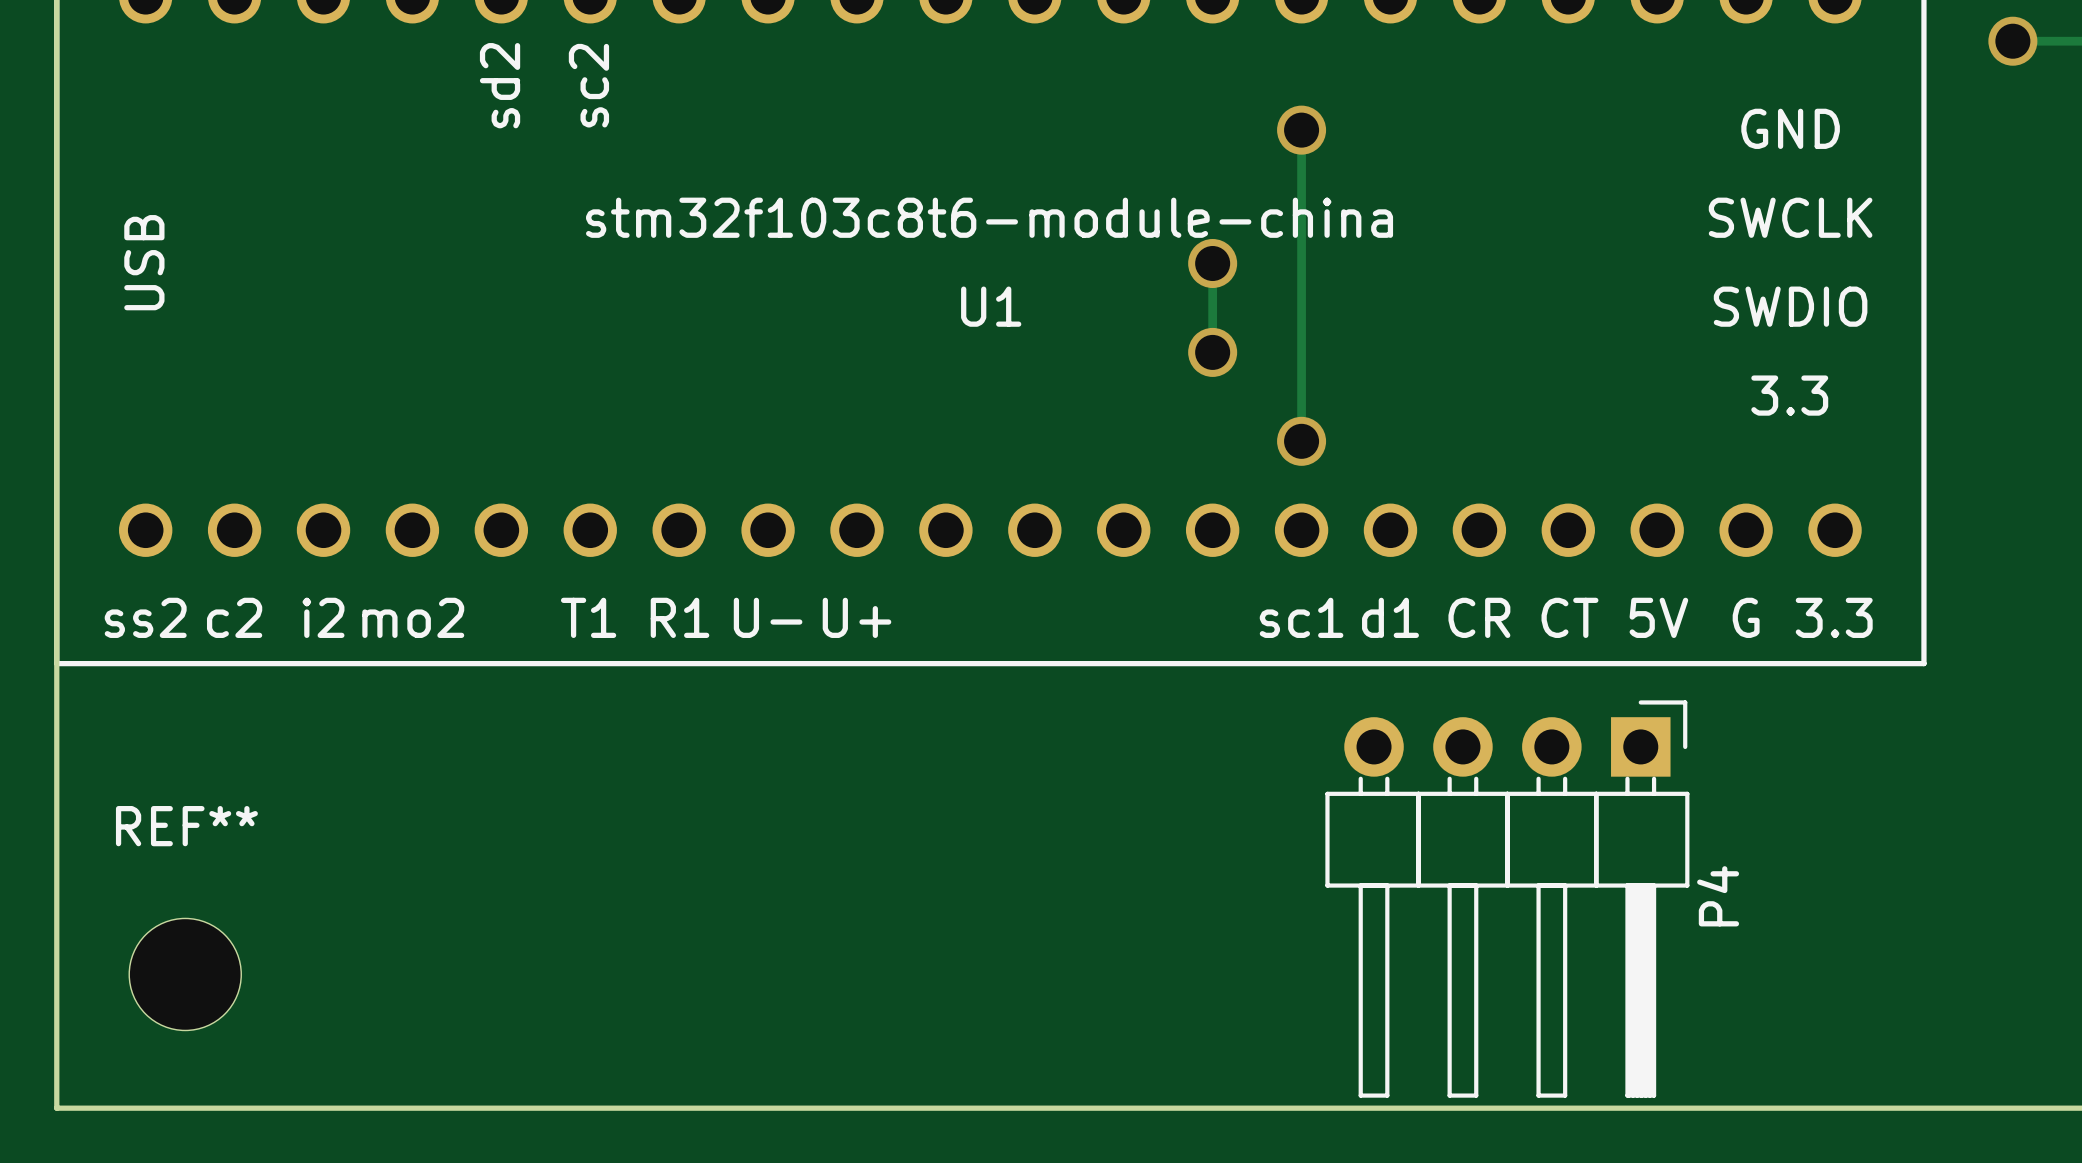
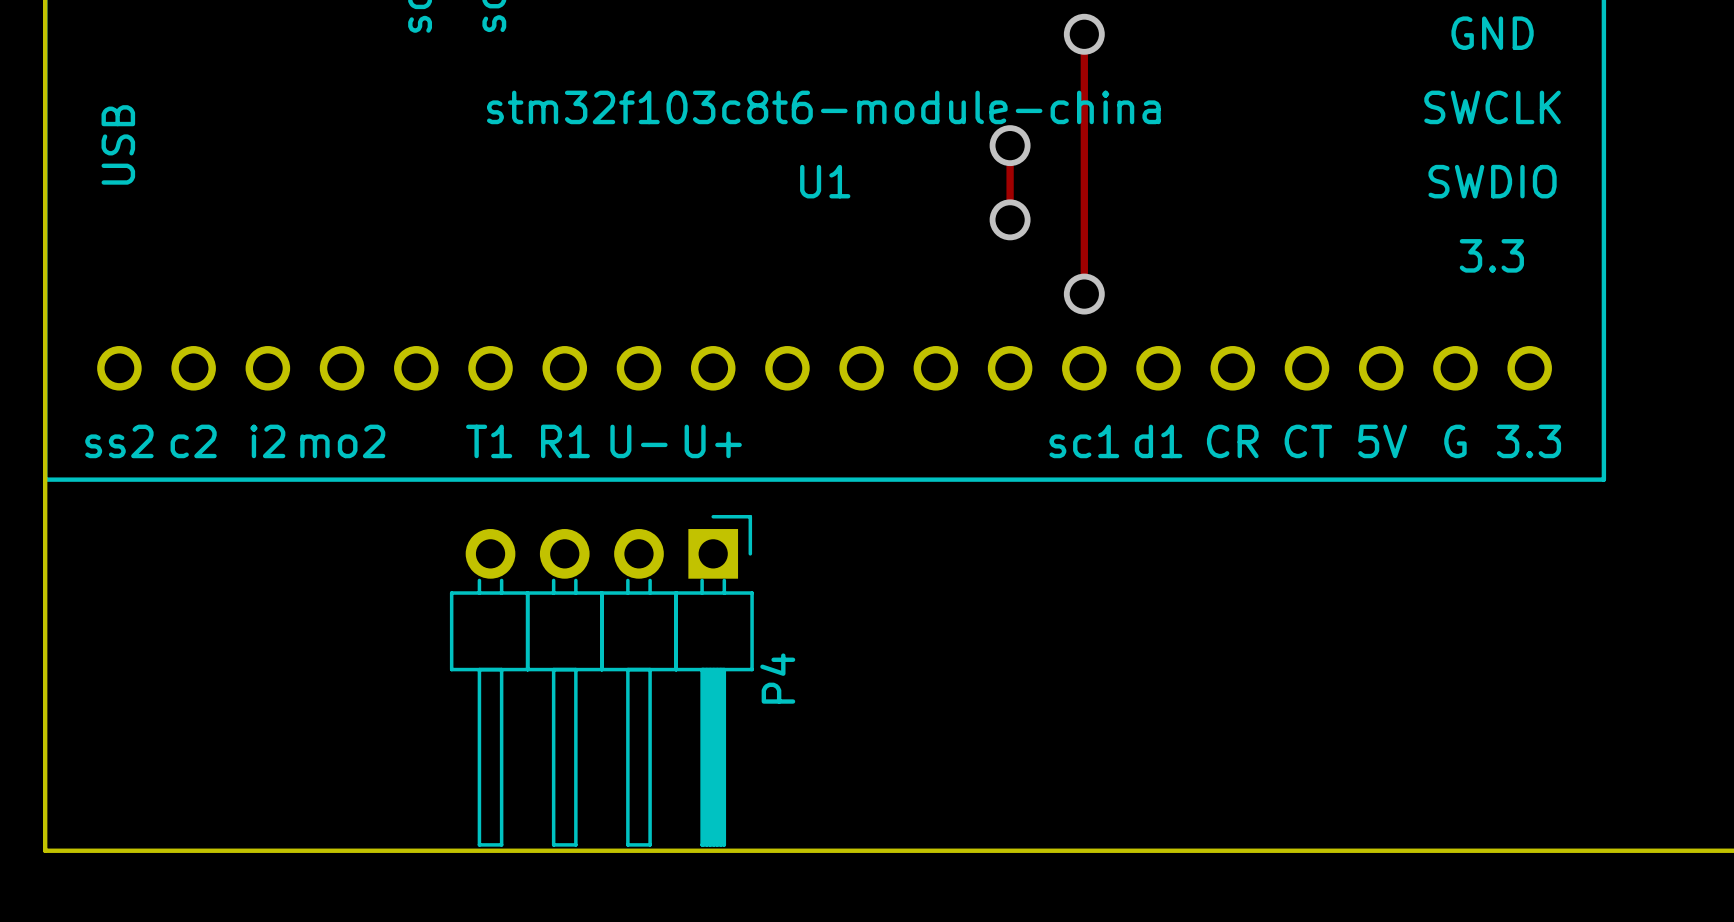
P4 position: (1507, 899) -> (601, 680)
REF**: (185, 974) -> none

